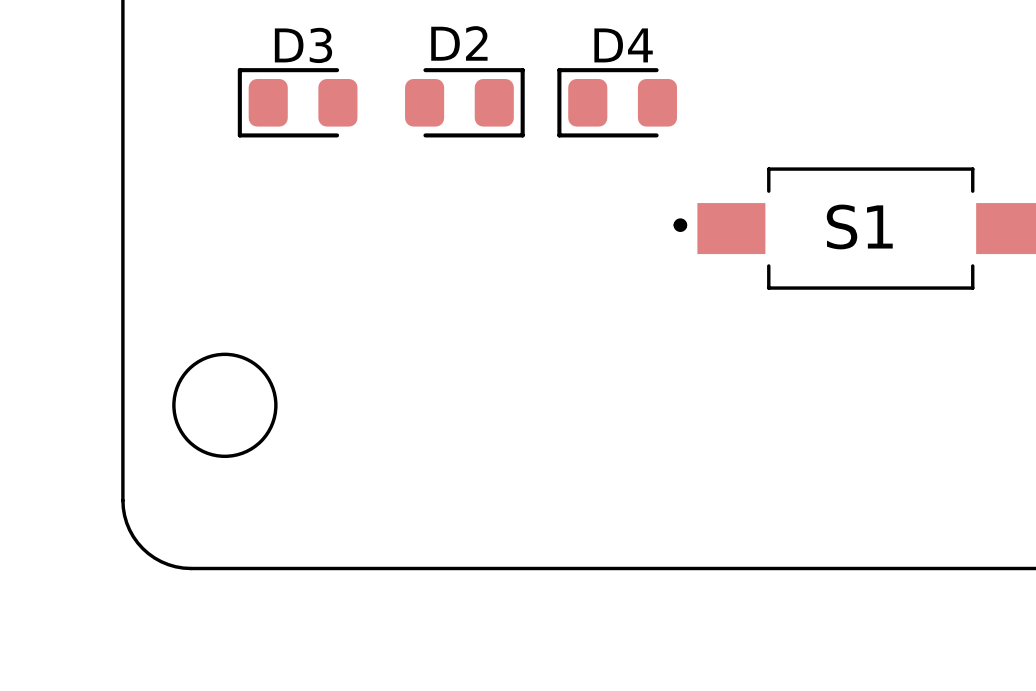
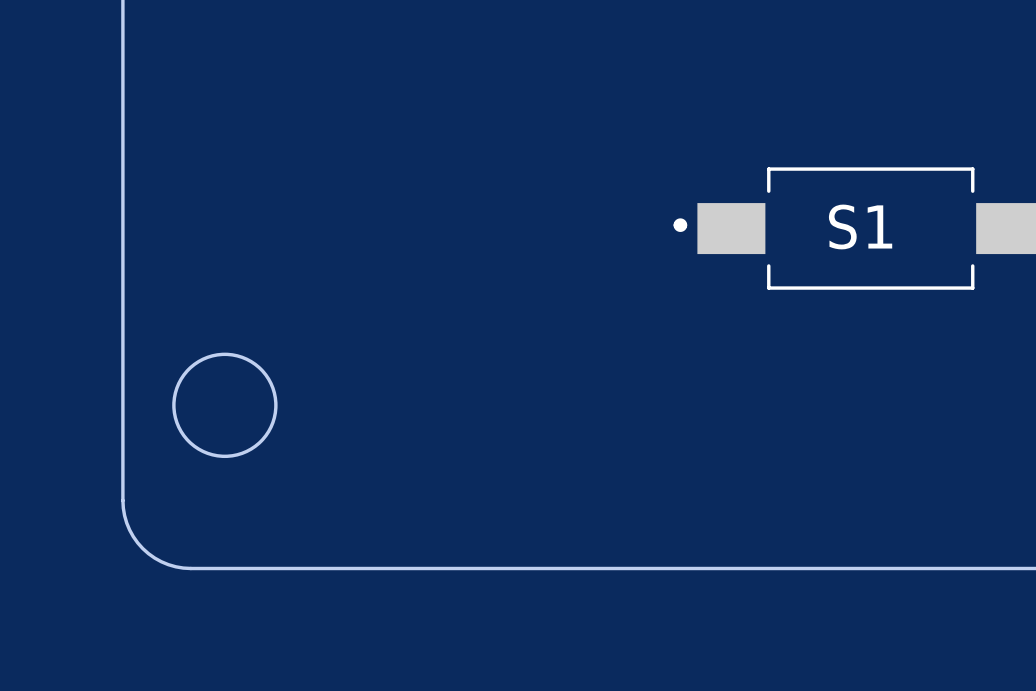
D3: (297, 102) -> none
D2: (464, 102) -> none
D4: (617, 102) -> none

